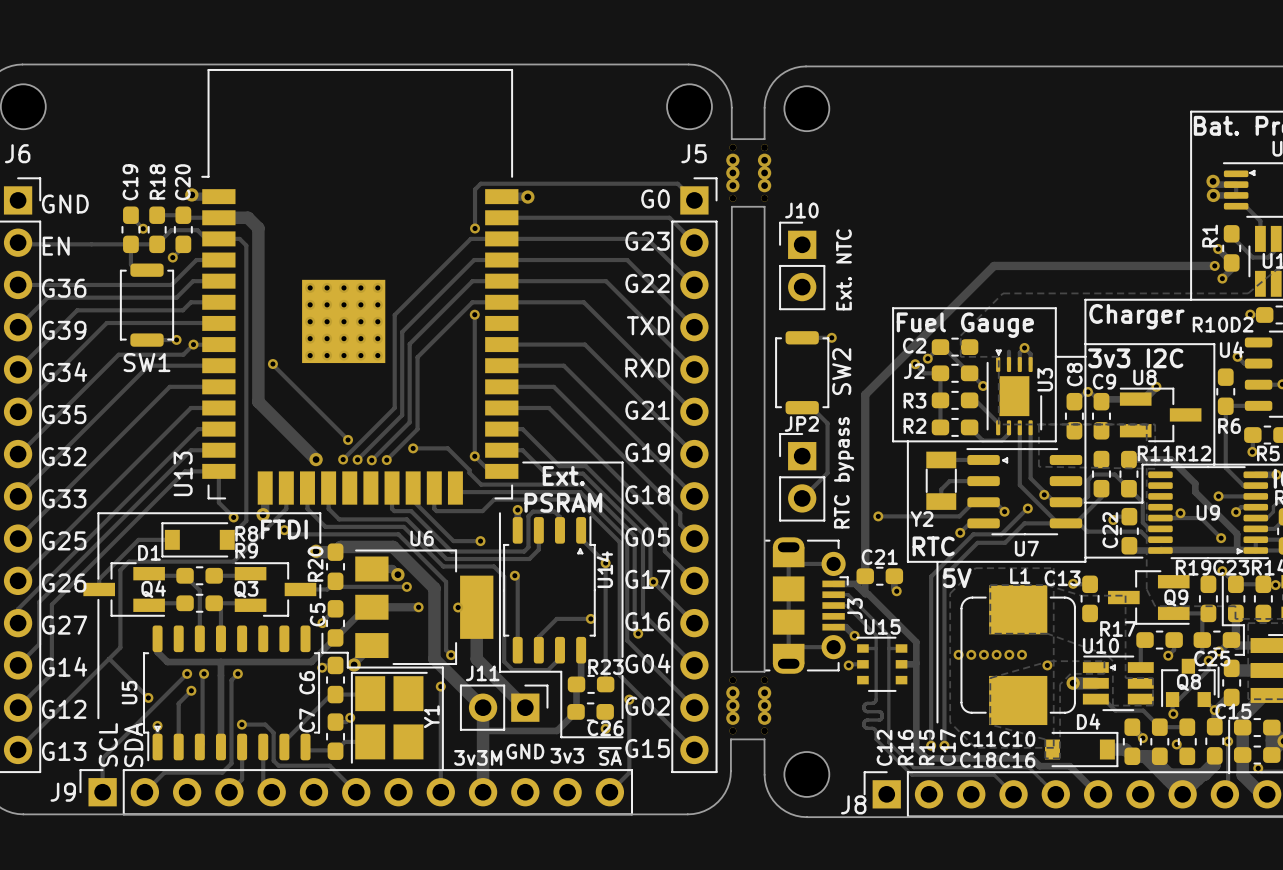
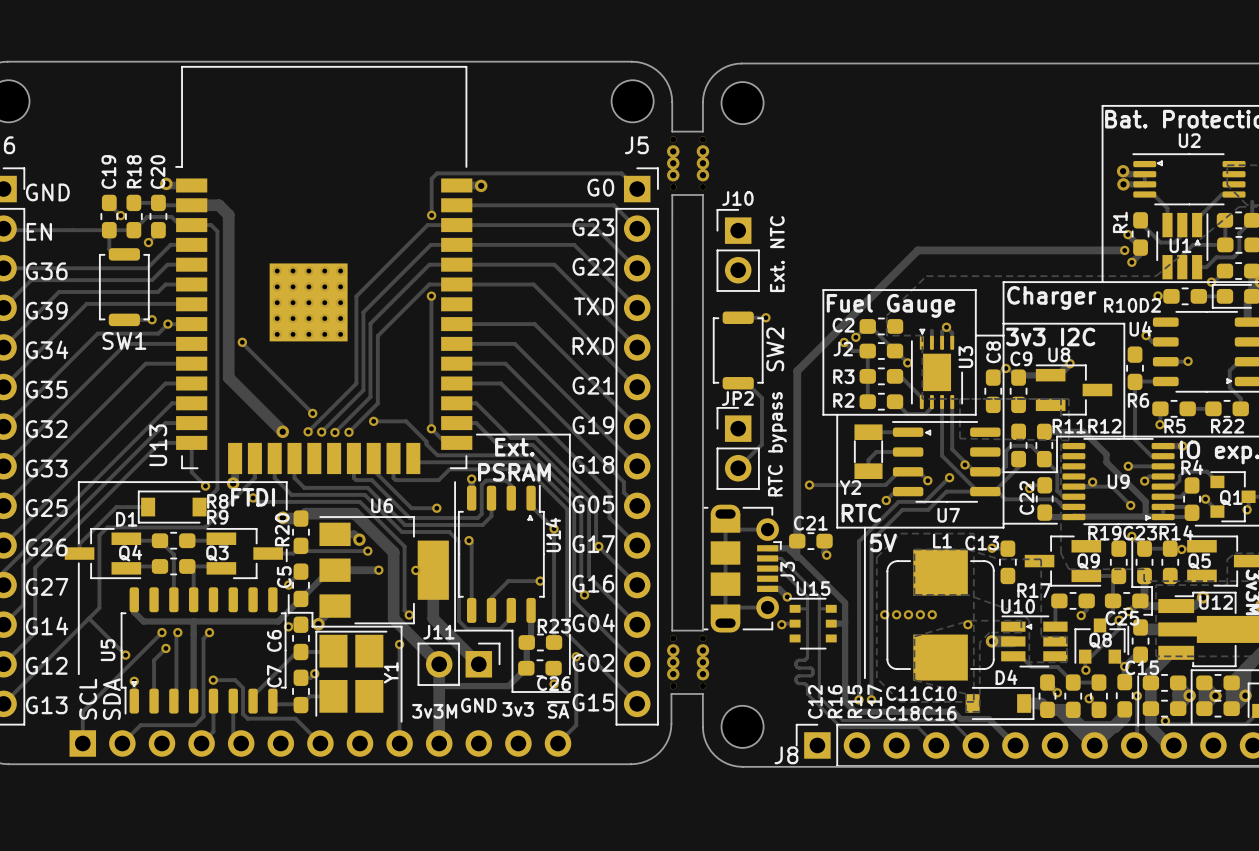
via: (1022, 654) -> none
J9 side: top (356, 792) -> bottom (320, 743)

